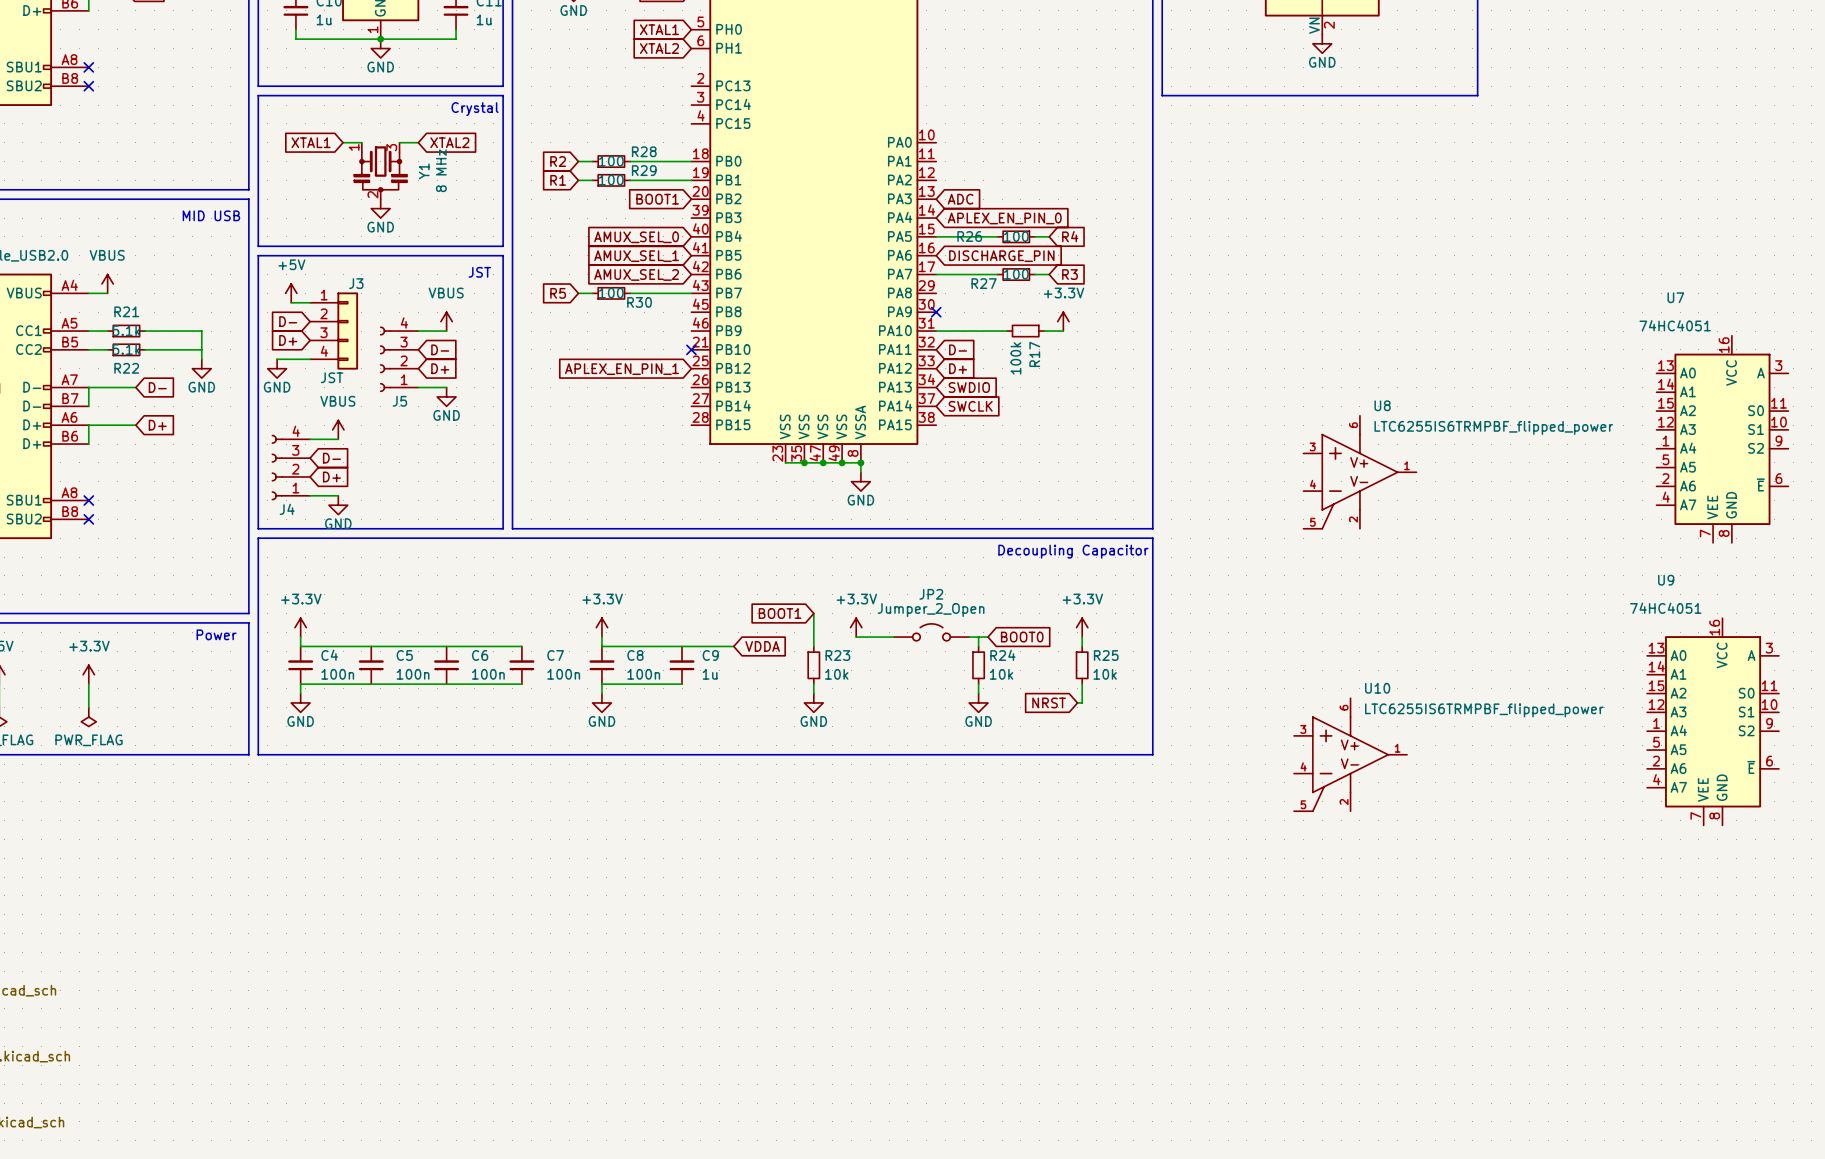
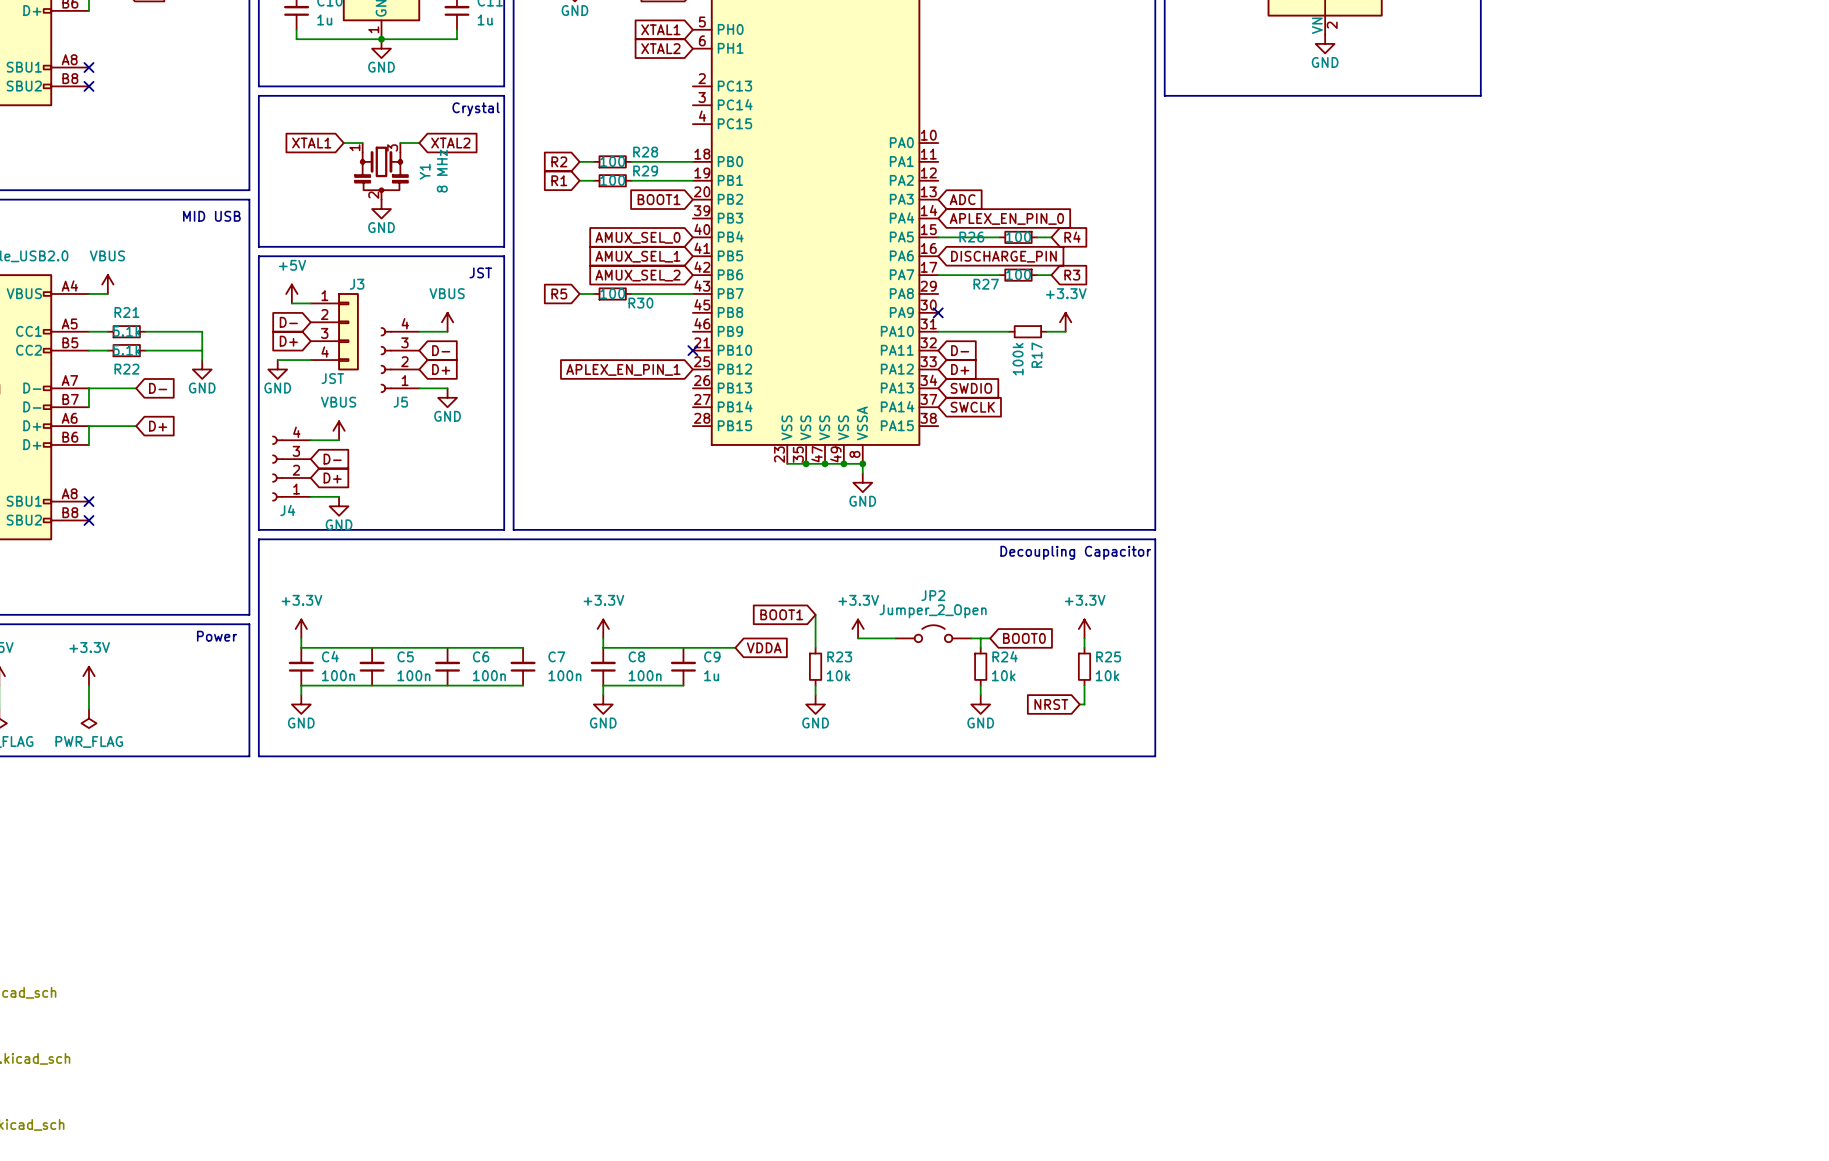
U7: 74HC4051 (1722, 439) -> none
U8: LTC6255IS6TRMPBF_flipped_power (1359, 472) -> none
U9: 74HC4051 (1713, 721) -> none
U10: LTC6255IS6TRMPBF_flipped_power (1350, 754) -> none

